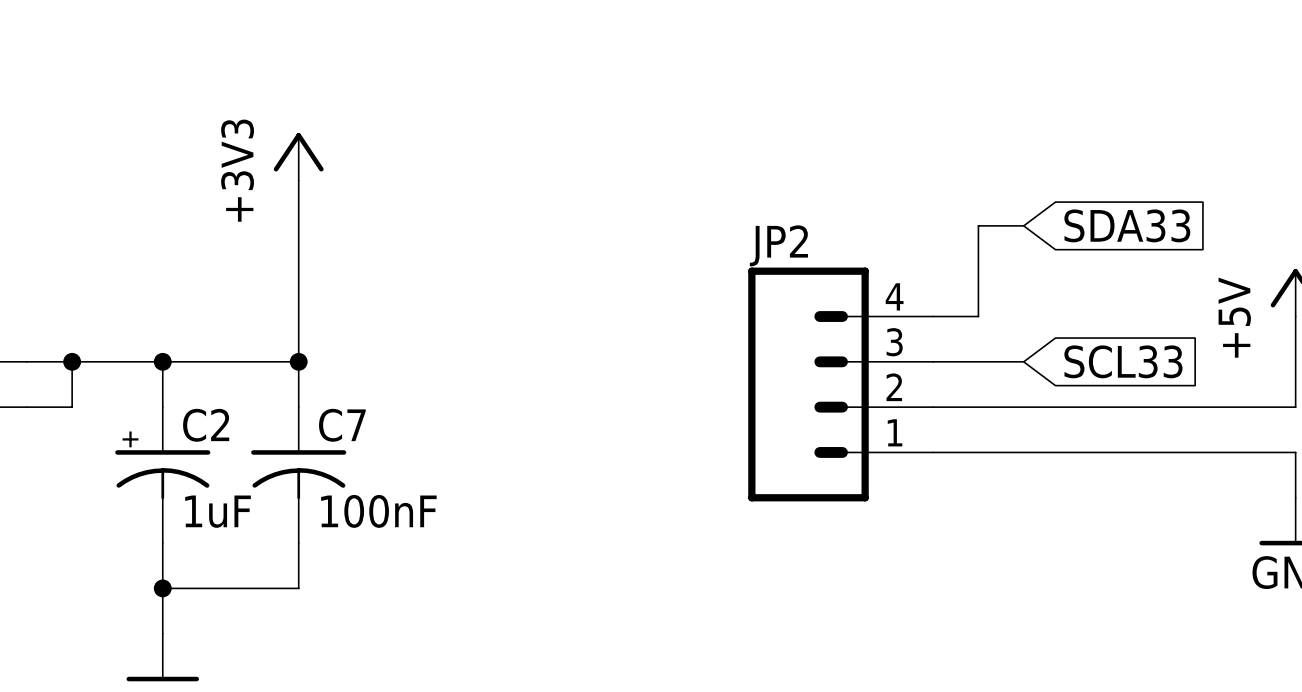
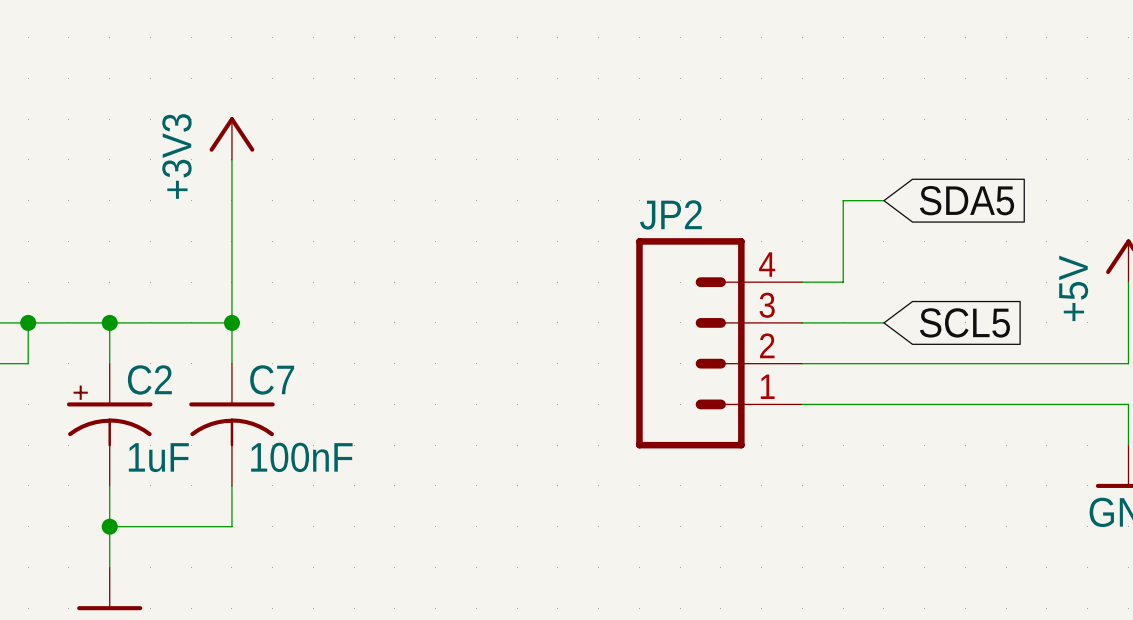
global label: SDA33 (1127, 225) -> SDA5 (967, 200)
global label: SCL33 (1123, 361) -> SCL5 (964, 322)

